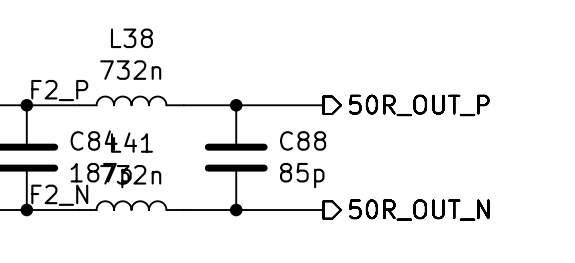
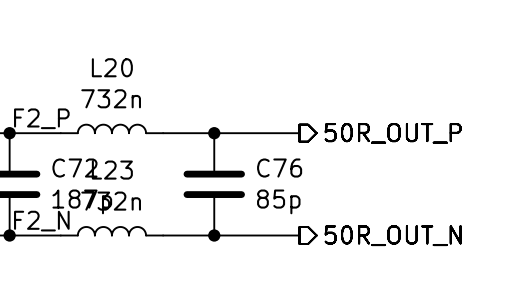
L38 name: L38 (131, 38) -> L20 (112, 67)
C84 name: C84 (94, 140) -> C72 (74, 168)
C88 name: C88 (303, 140) -> C76 (279, 168)
L41 name: L41 (131, 142) -> L23 (112, 170)

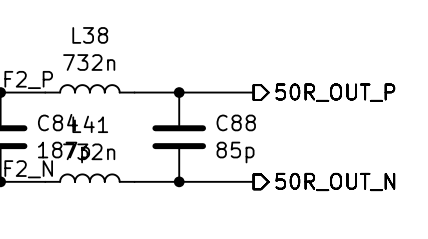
L20 name: L20 (112, 67) -> L38 (90, 35)
C72 name: C72 (74, 168) -> C84 (57, 122)
C76 name: C76 (279, 168) -> C88 (236, 122)
L23 name: L23 (112, 170) -> L41 (90, 124)

